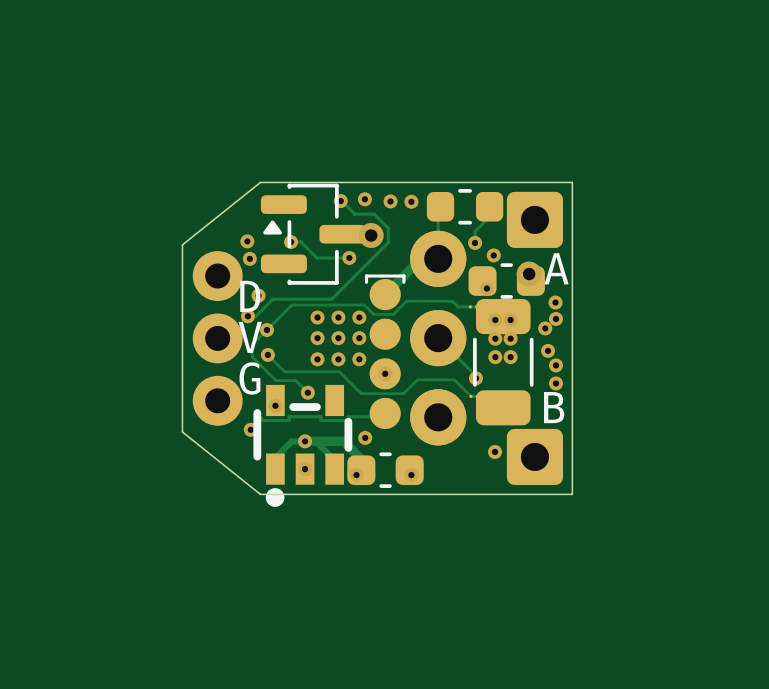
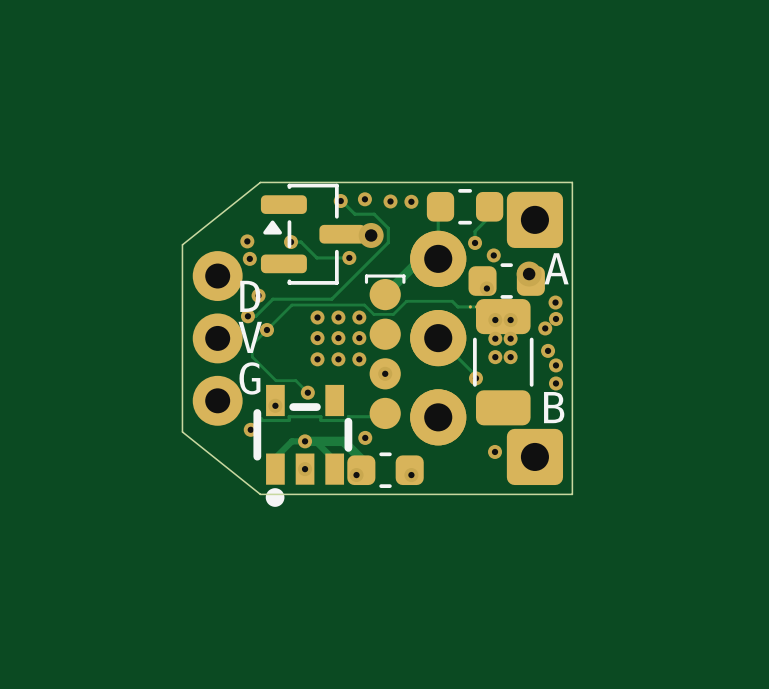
track: (267, 354) (284, 371) (339, 371) (361, 393) (403, 393) (417, 379) (454, 379) (470, 396) -> none
via: (267, 354) -> none
part: (474, 396) -> none

